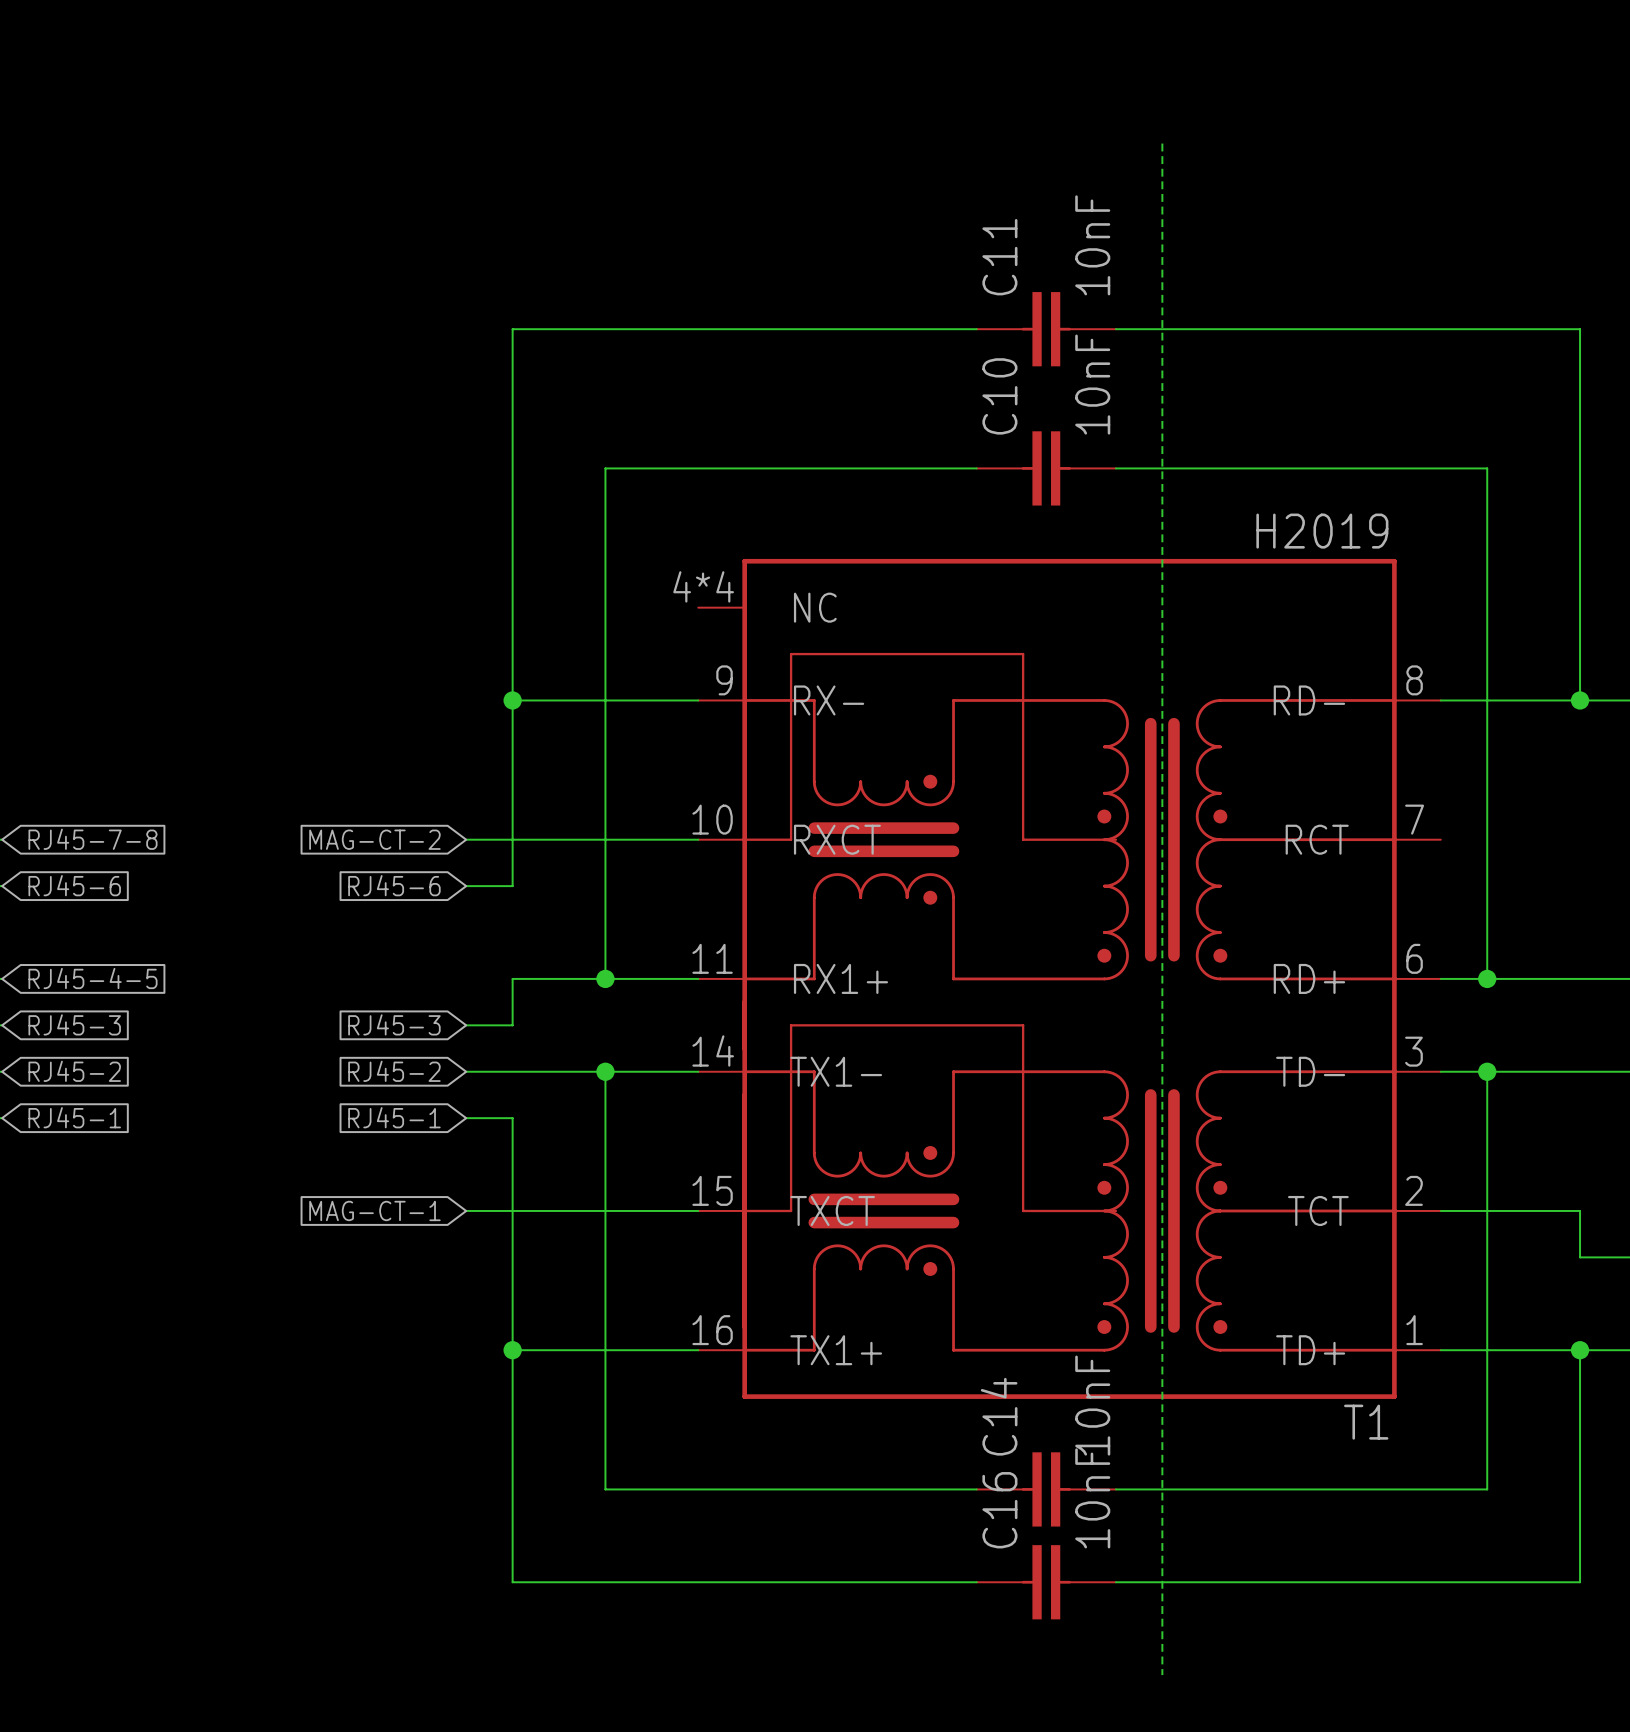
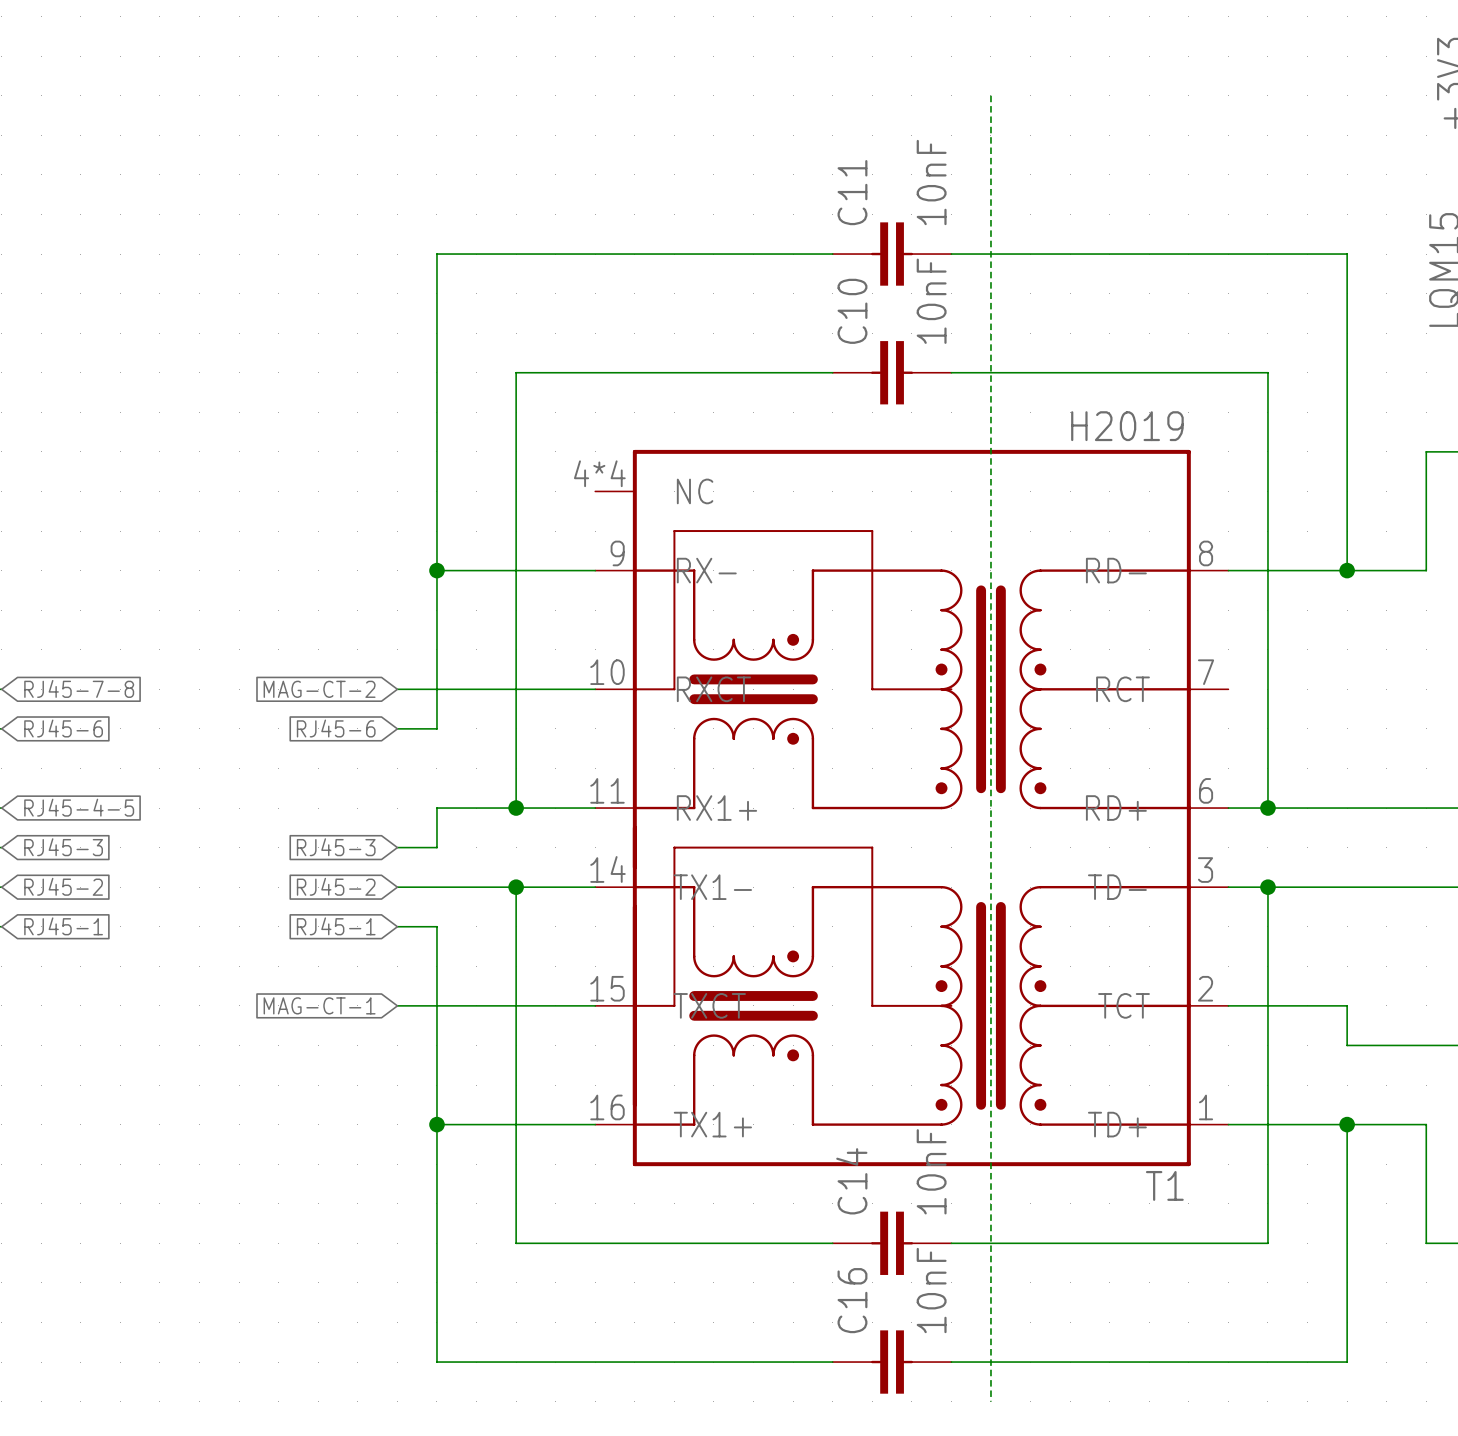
wire: (512, 1582) (976, 1582) -> (436, 1322) (436, 1362) (832, 1362)
C16 position: (1046, 1582) -> (892, 1362)
wire: (1115, 1582) (1580, 1582) -> (951, 1362) (1347, 1362) (1347, 1322)

